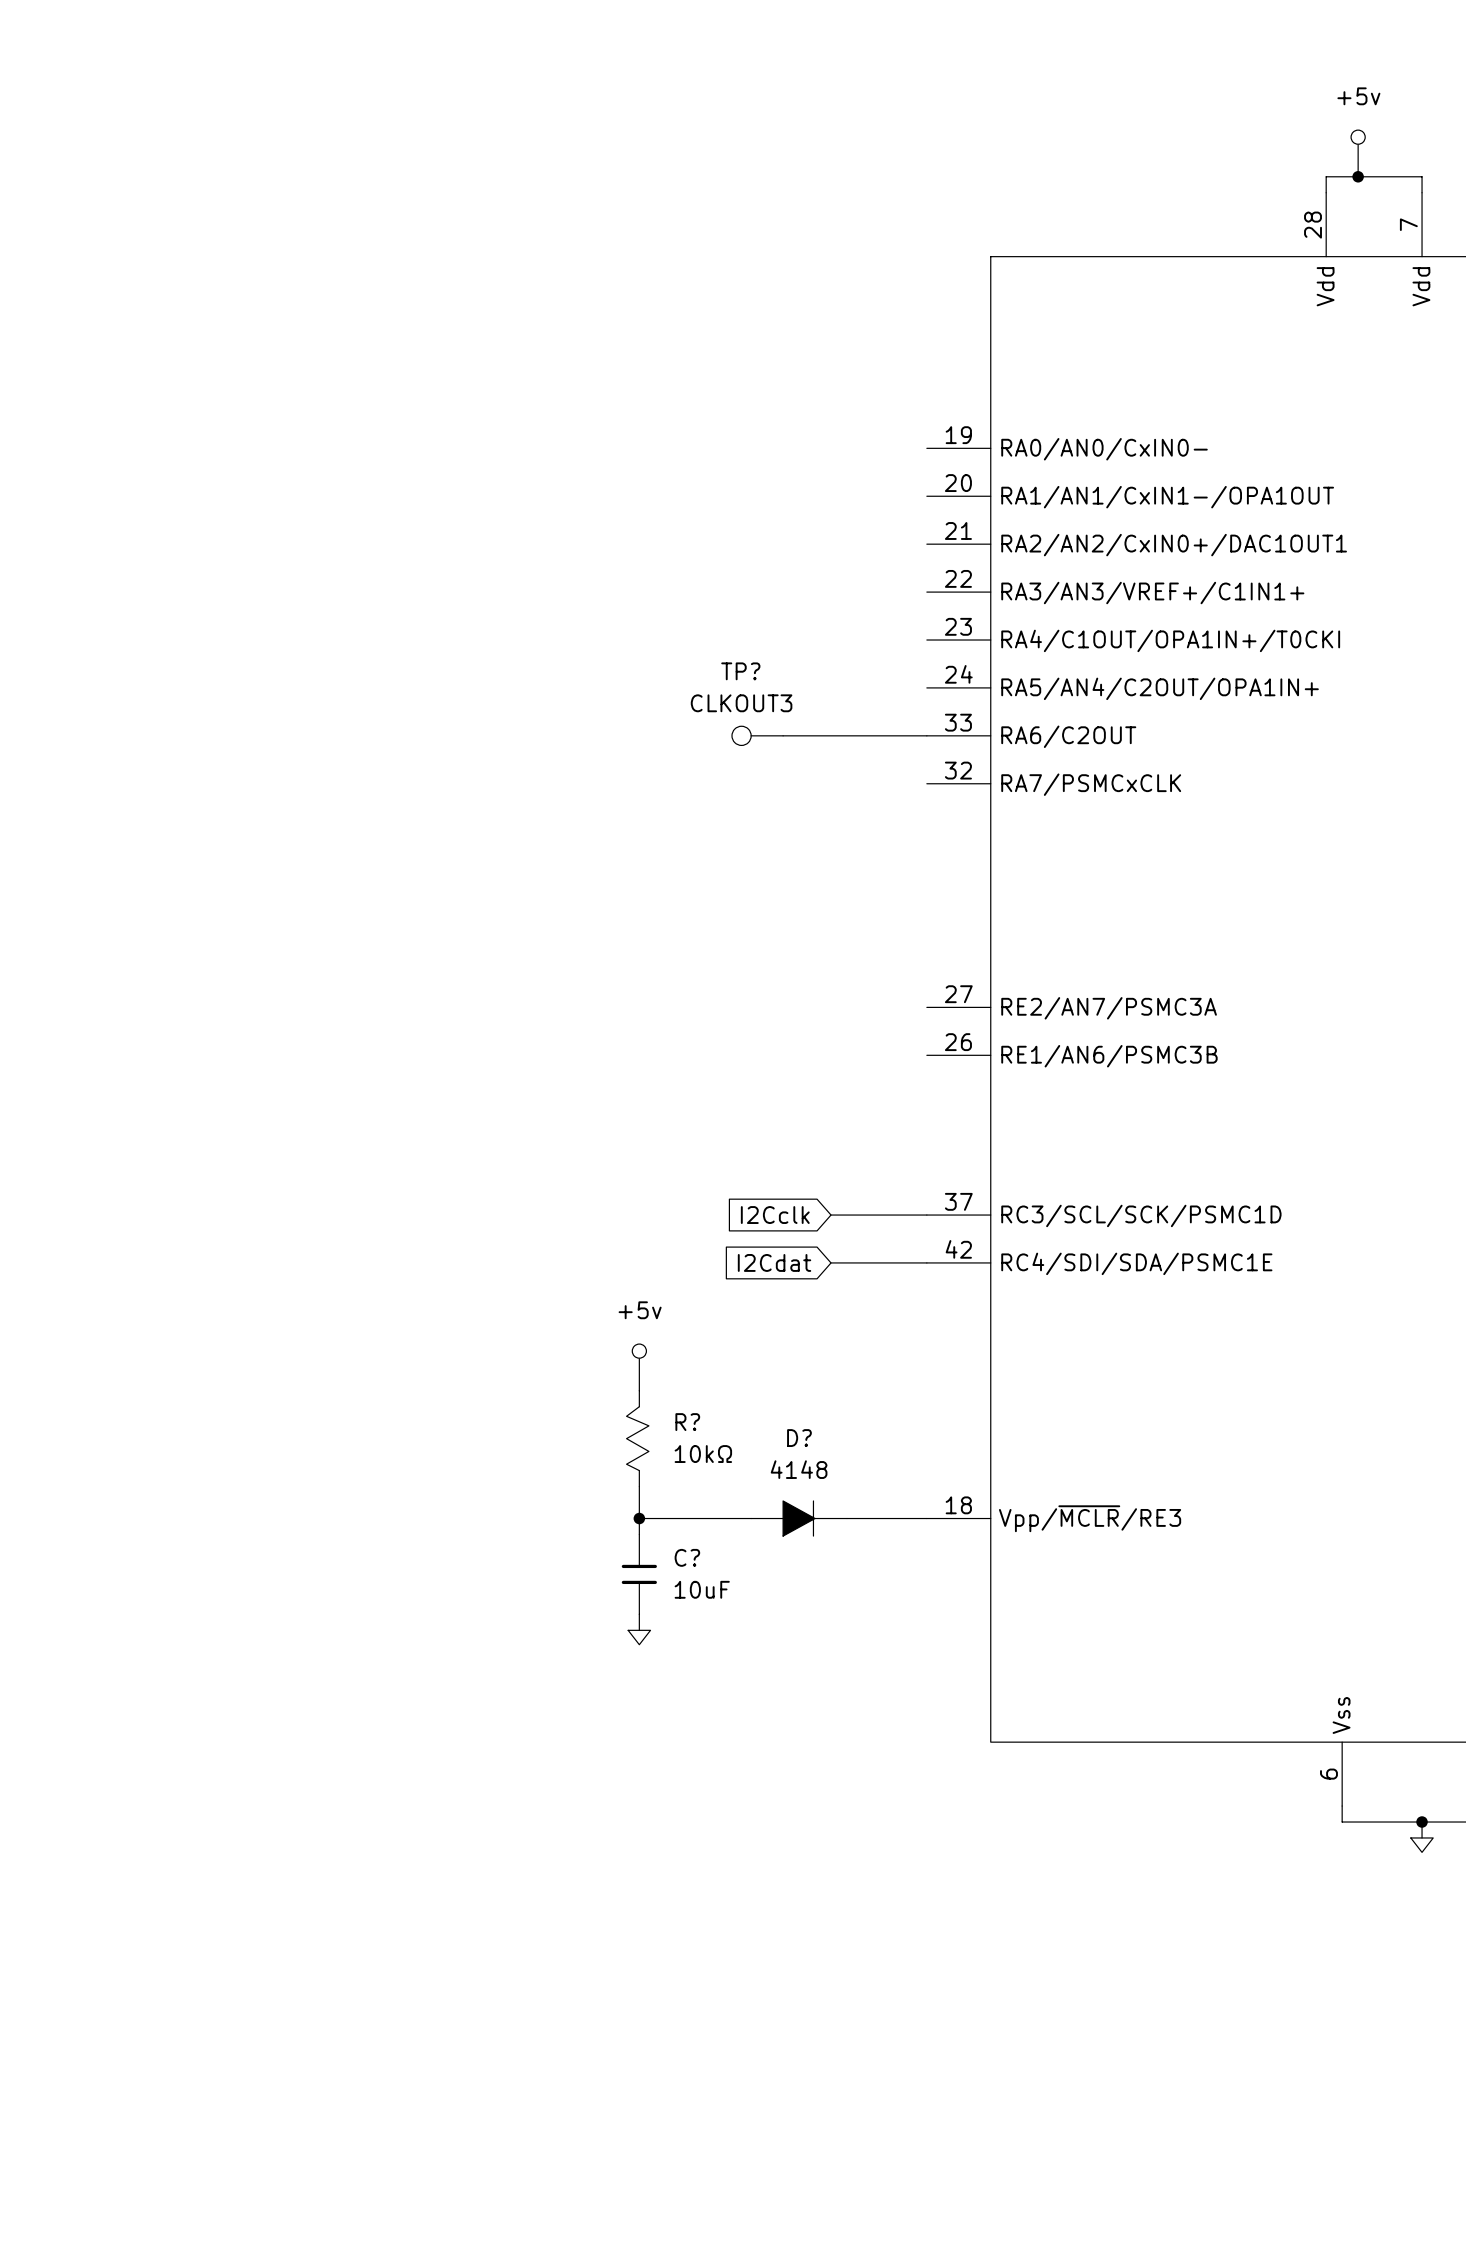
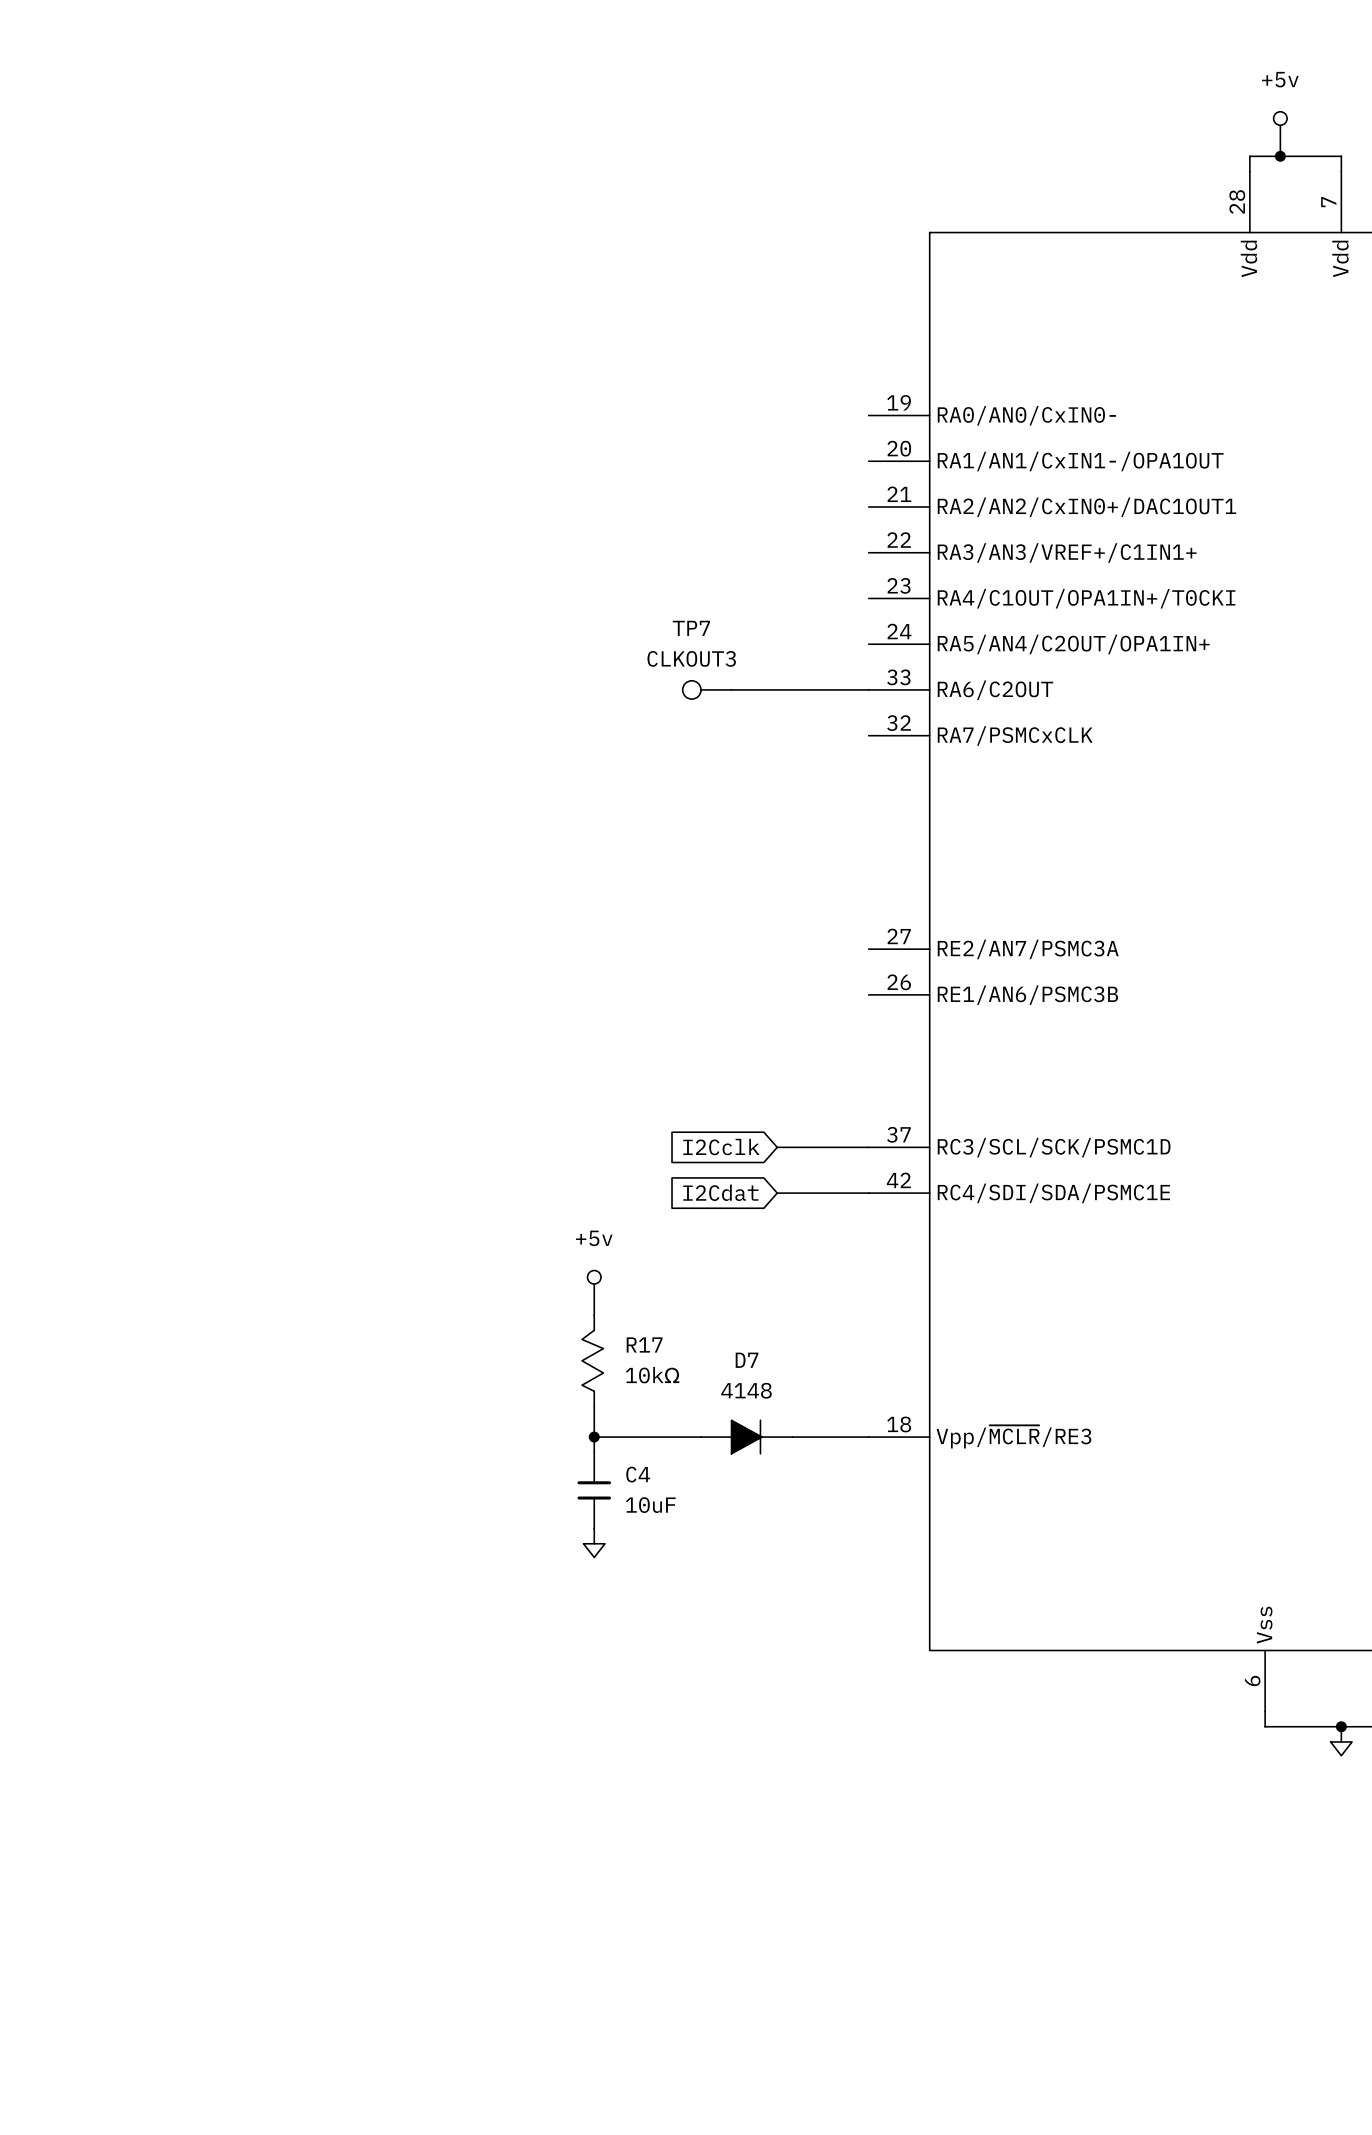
TP? name: TP? (740, 671) -> TP7 (691, 628)
R? name: R? (687, 1422) -> R17 (644, 1344)
D? name: D? (799, 1438) -> D7 (747, 1360)
C? name: C? (687, 1557) -> C4 (638, 1474)

